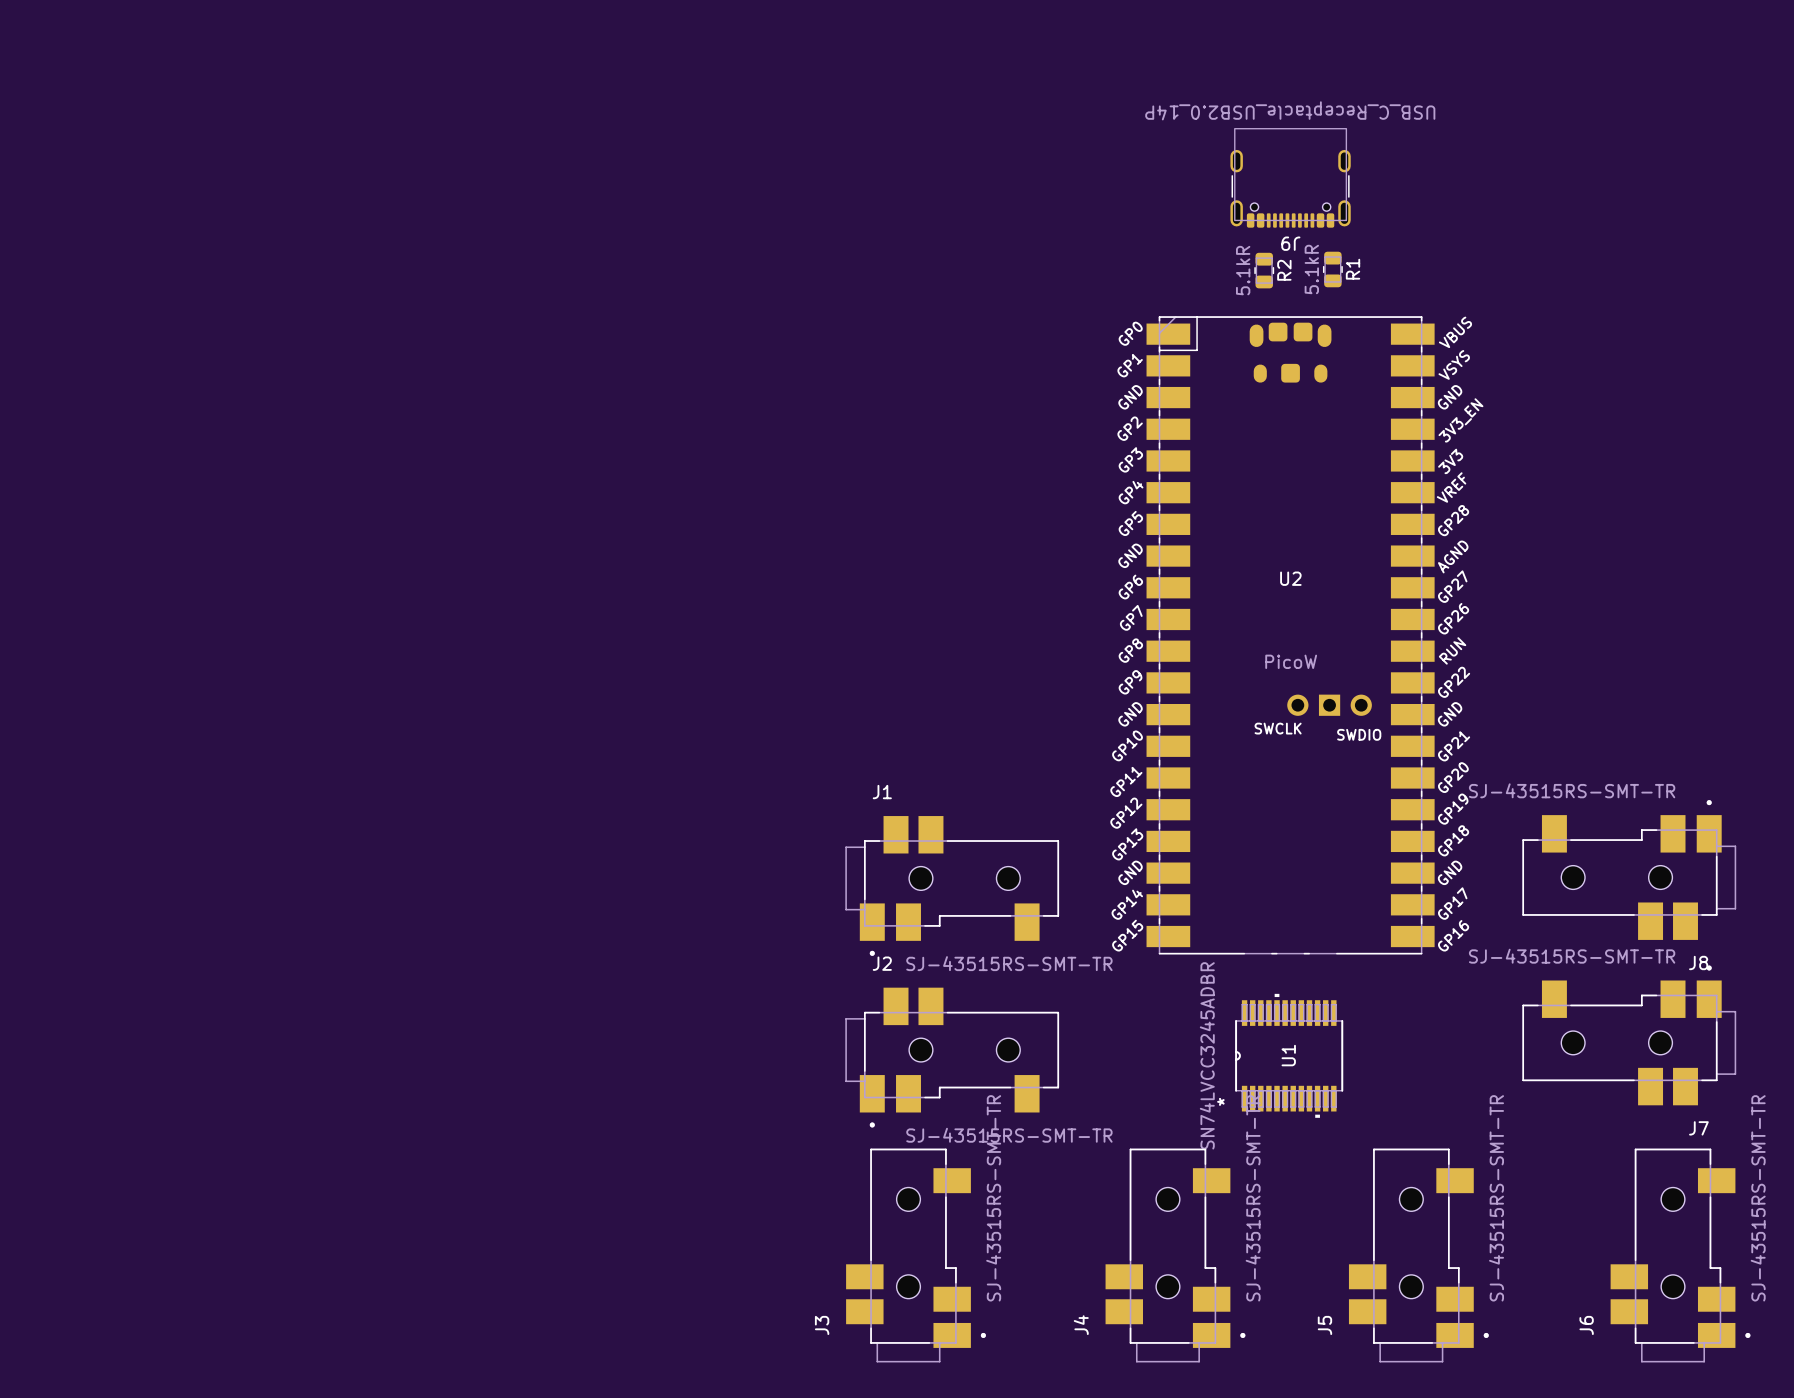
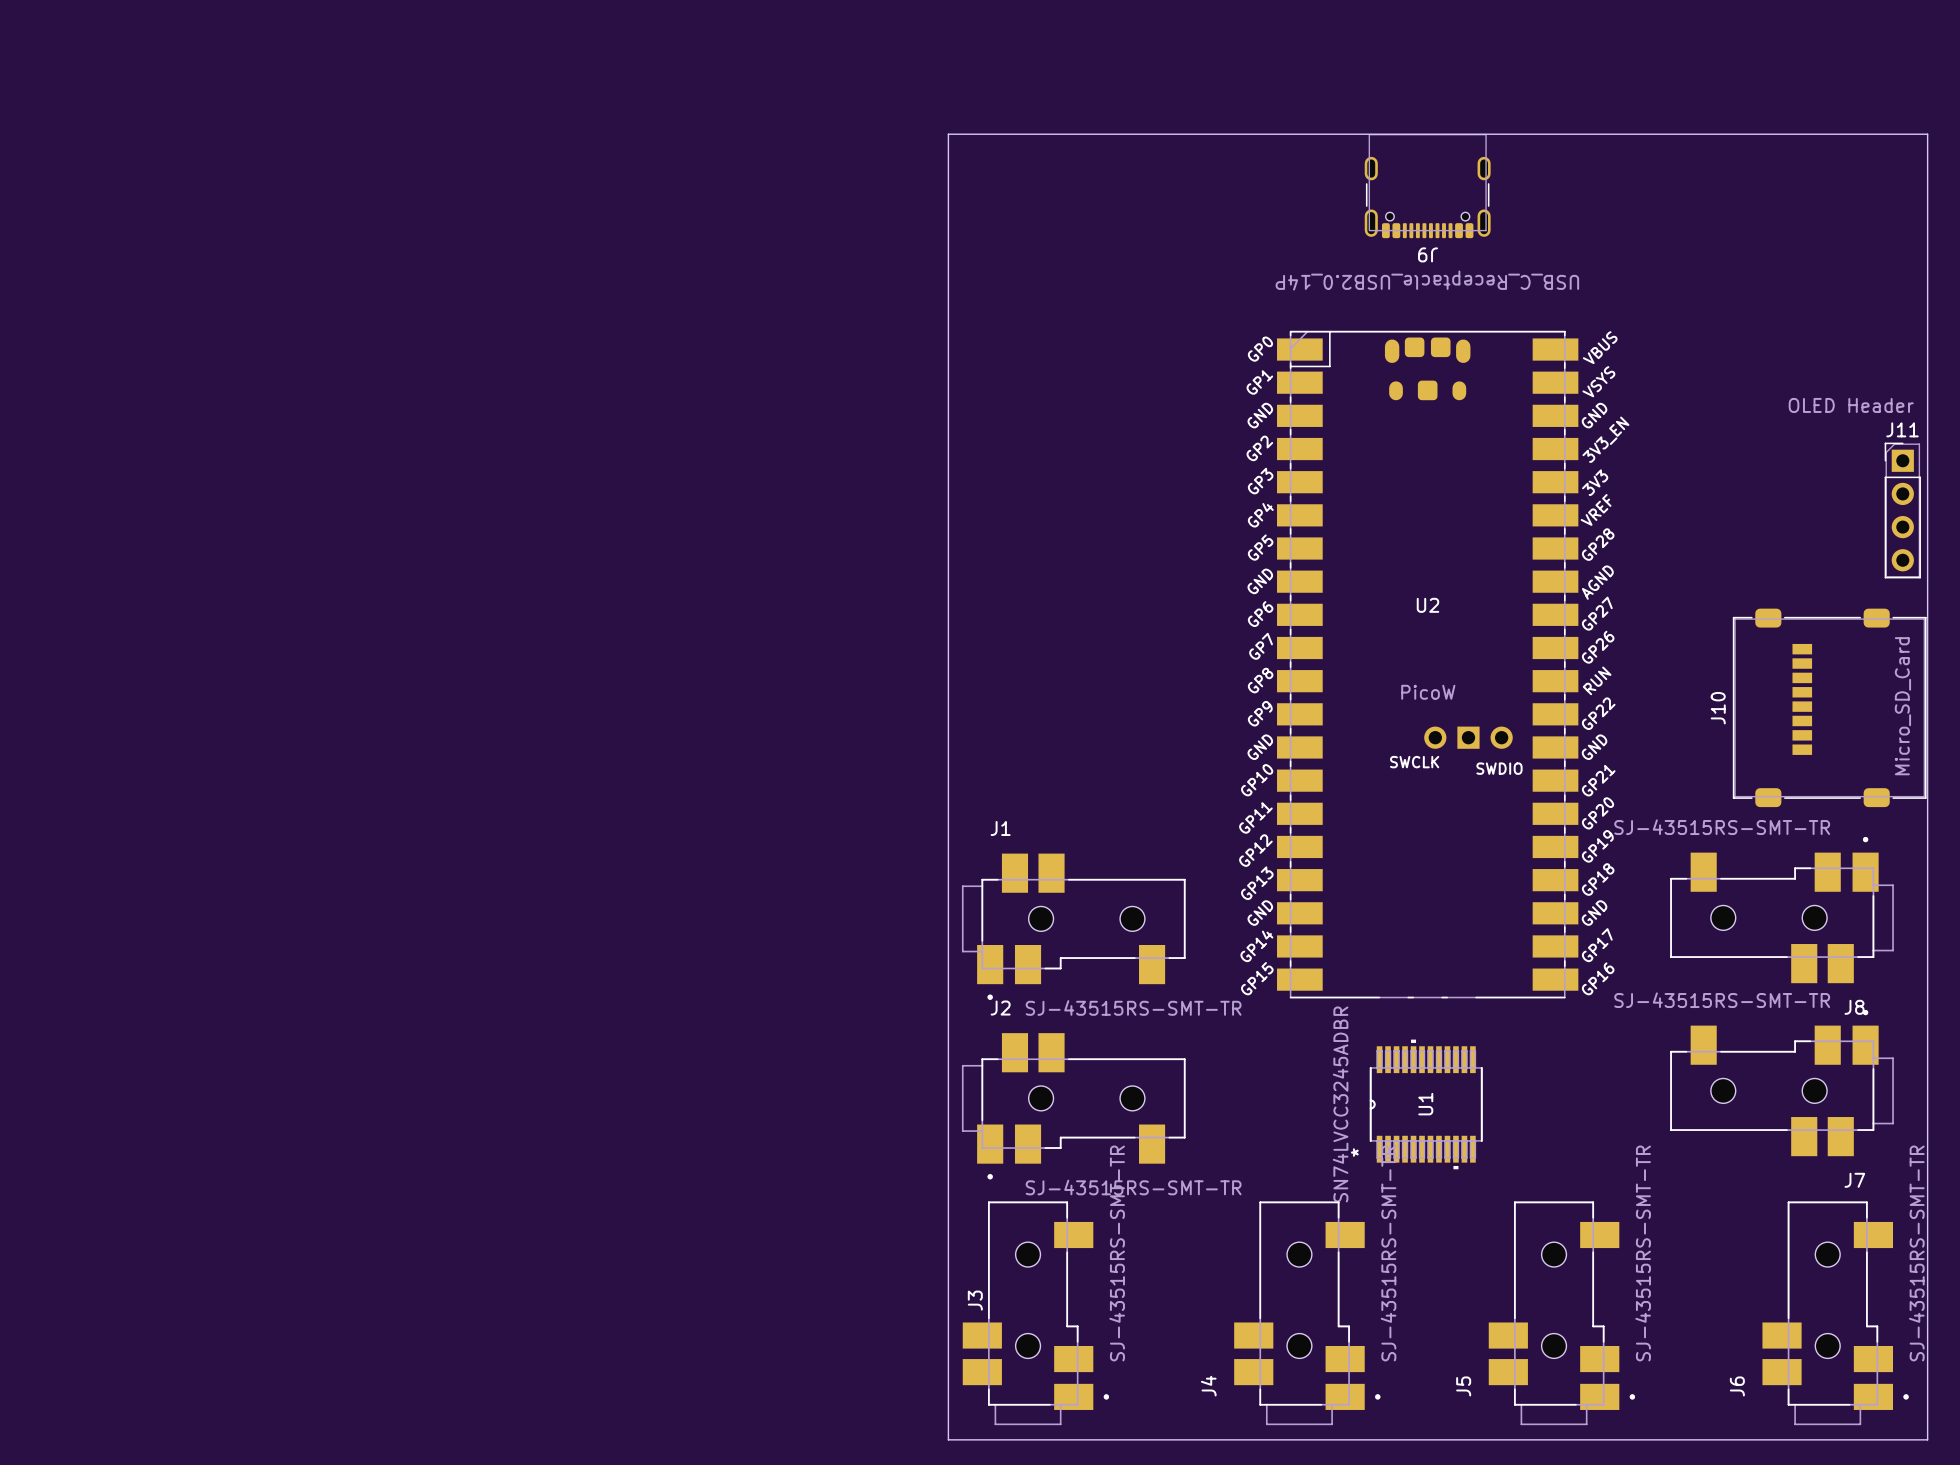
J9 value position: USB_C_Receptacle_USB2.0_14P (1290, 110) -> USB_C_Receptacle_USB2.0_14P (1427, 280)
board edge: none -> (948, 134) (1927, 134) (1927, 1439) (948, 1439) (948, 134)
R1: 5.1kR (1332, 269) -> none
R2: 5.1kR (1264, 270) -> none
J11: none -> OLED Header (1902, 510)
J10: none -> Micro_SD_Card (1829, 707)
J3 name position: J3 (822, 1325) -> J3 (975, 1300)

